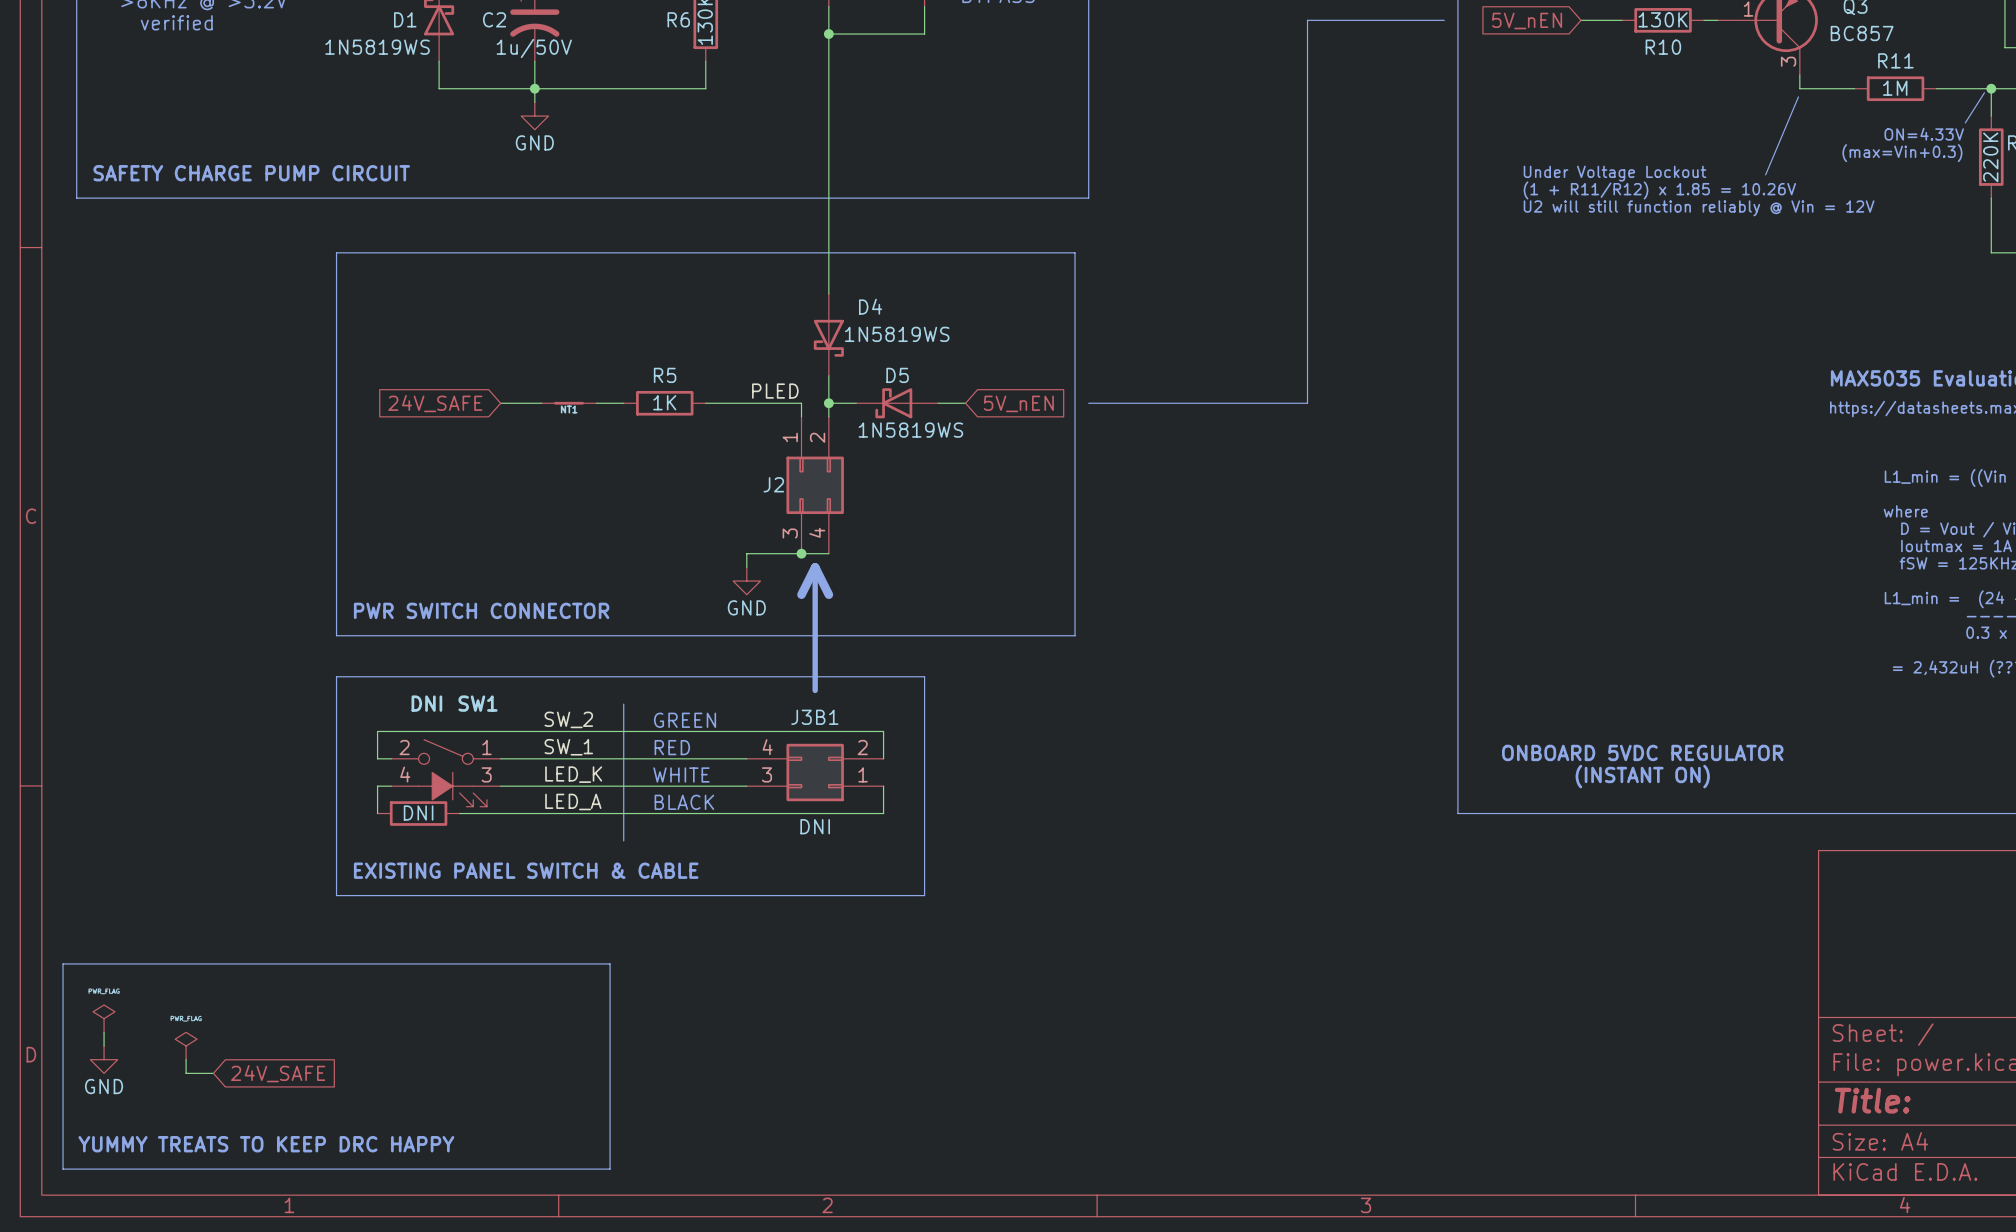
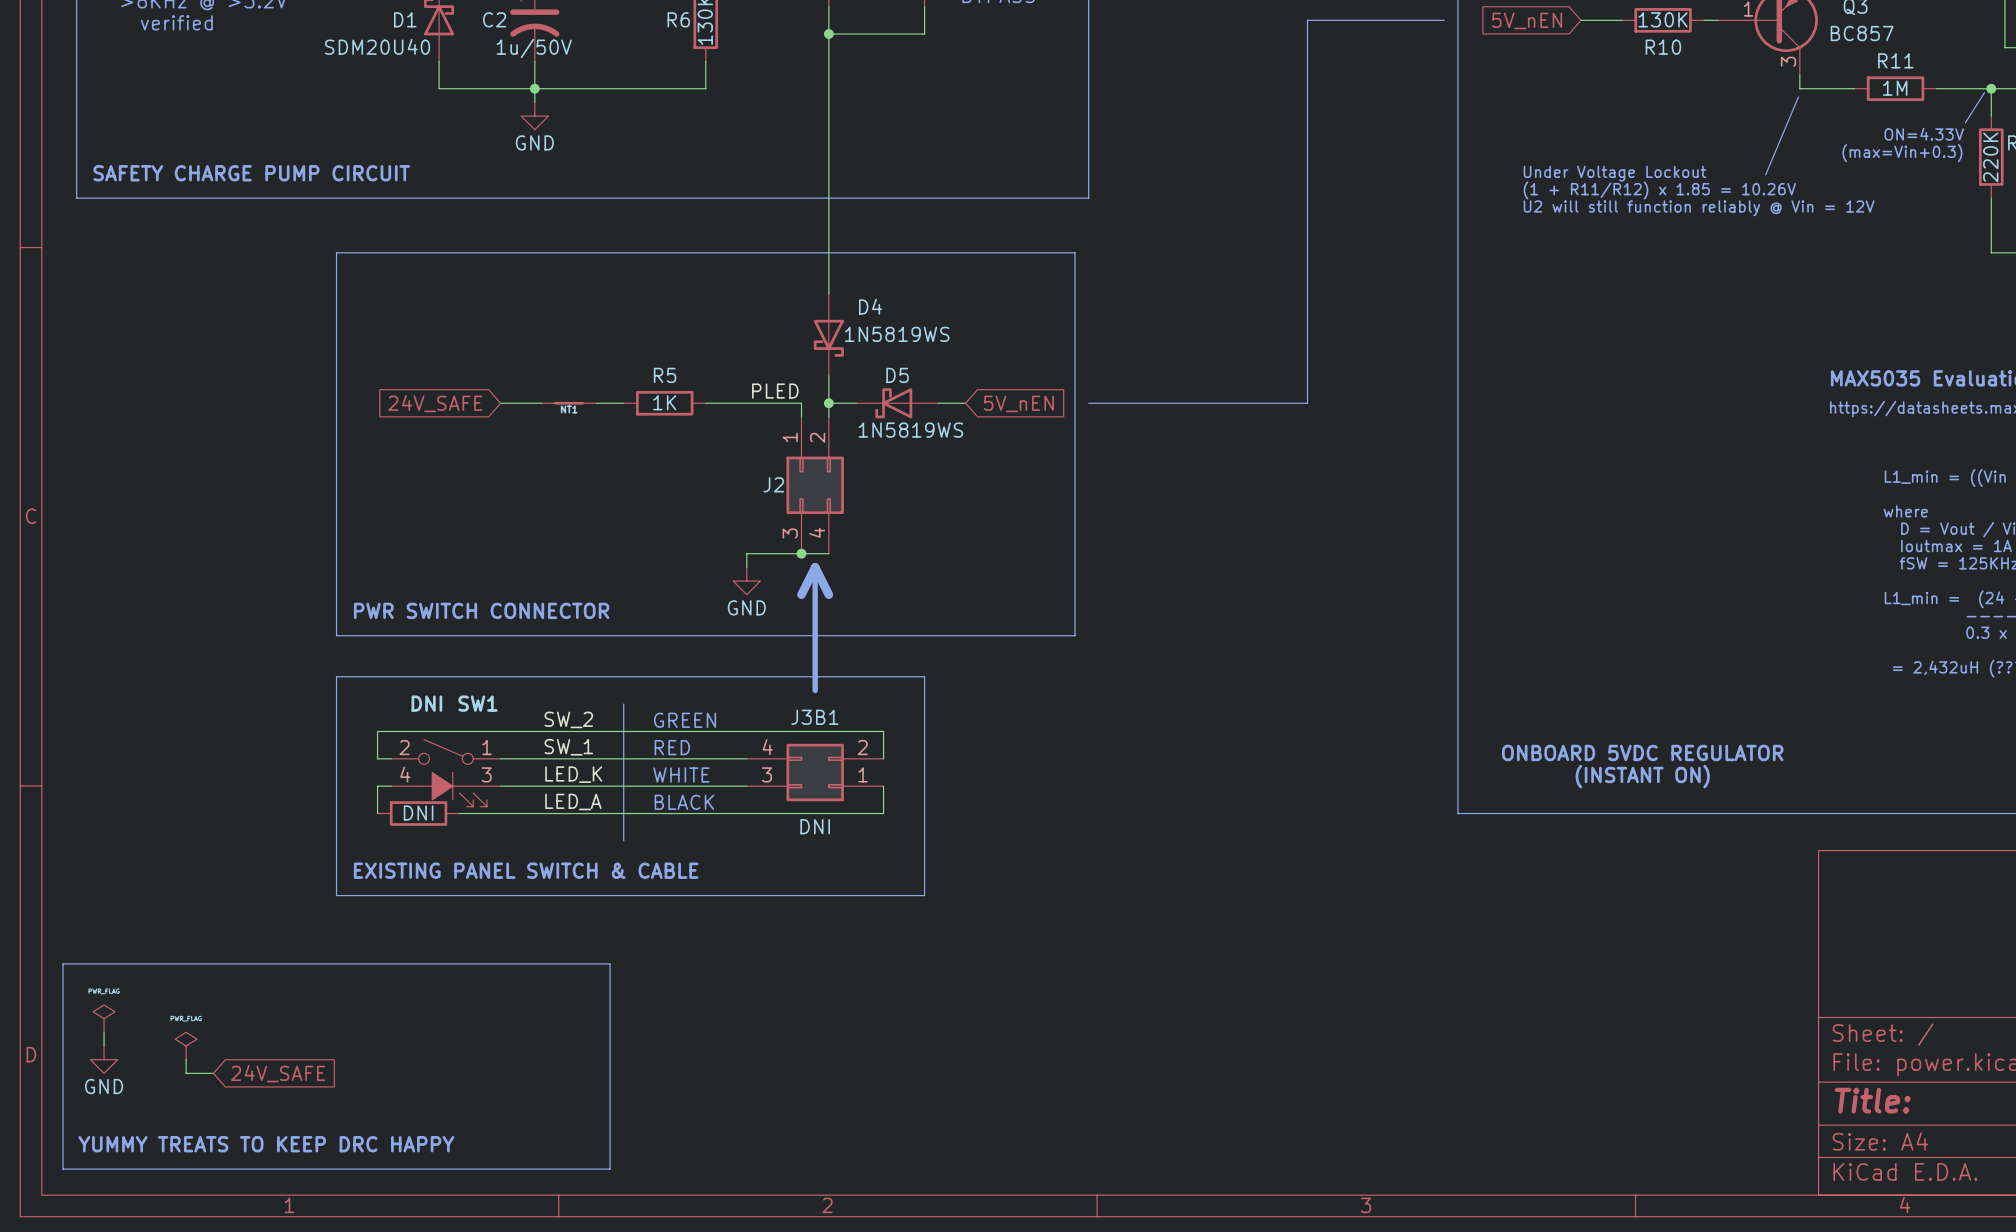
D1 value: 1N5819WS (377, 47) -> SDM20U40 (377, 46)

